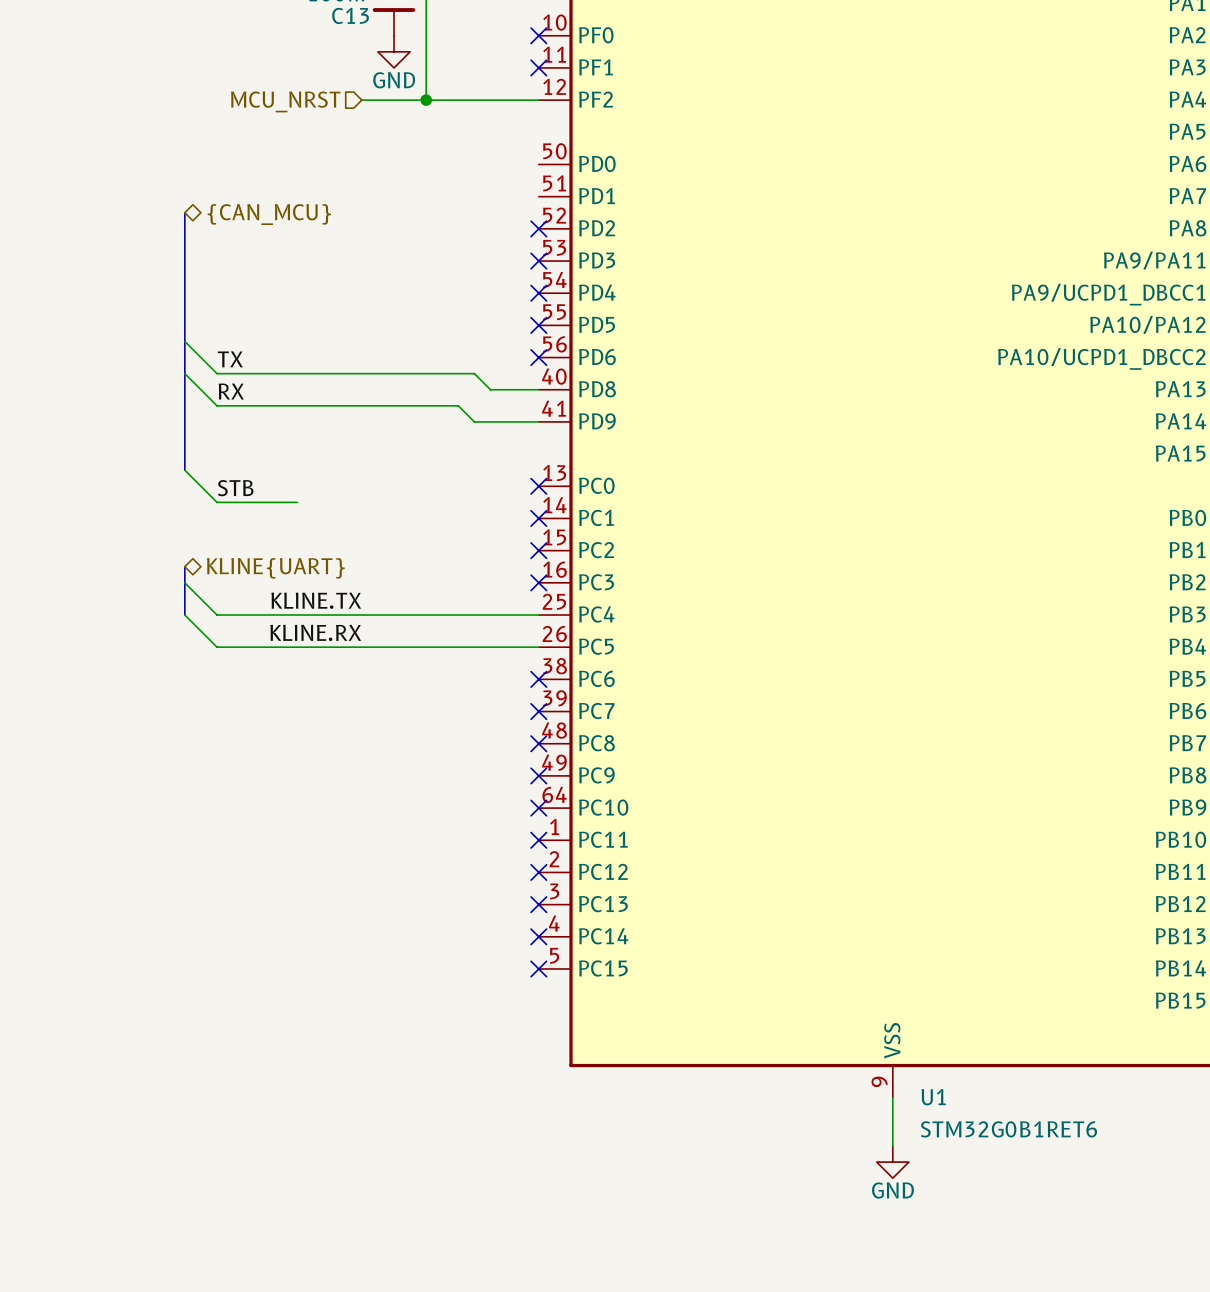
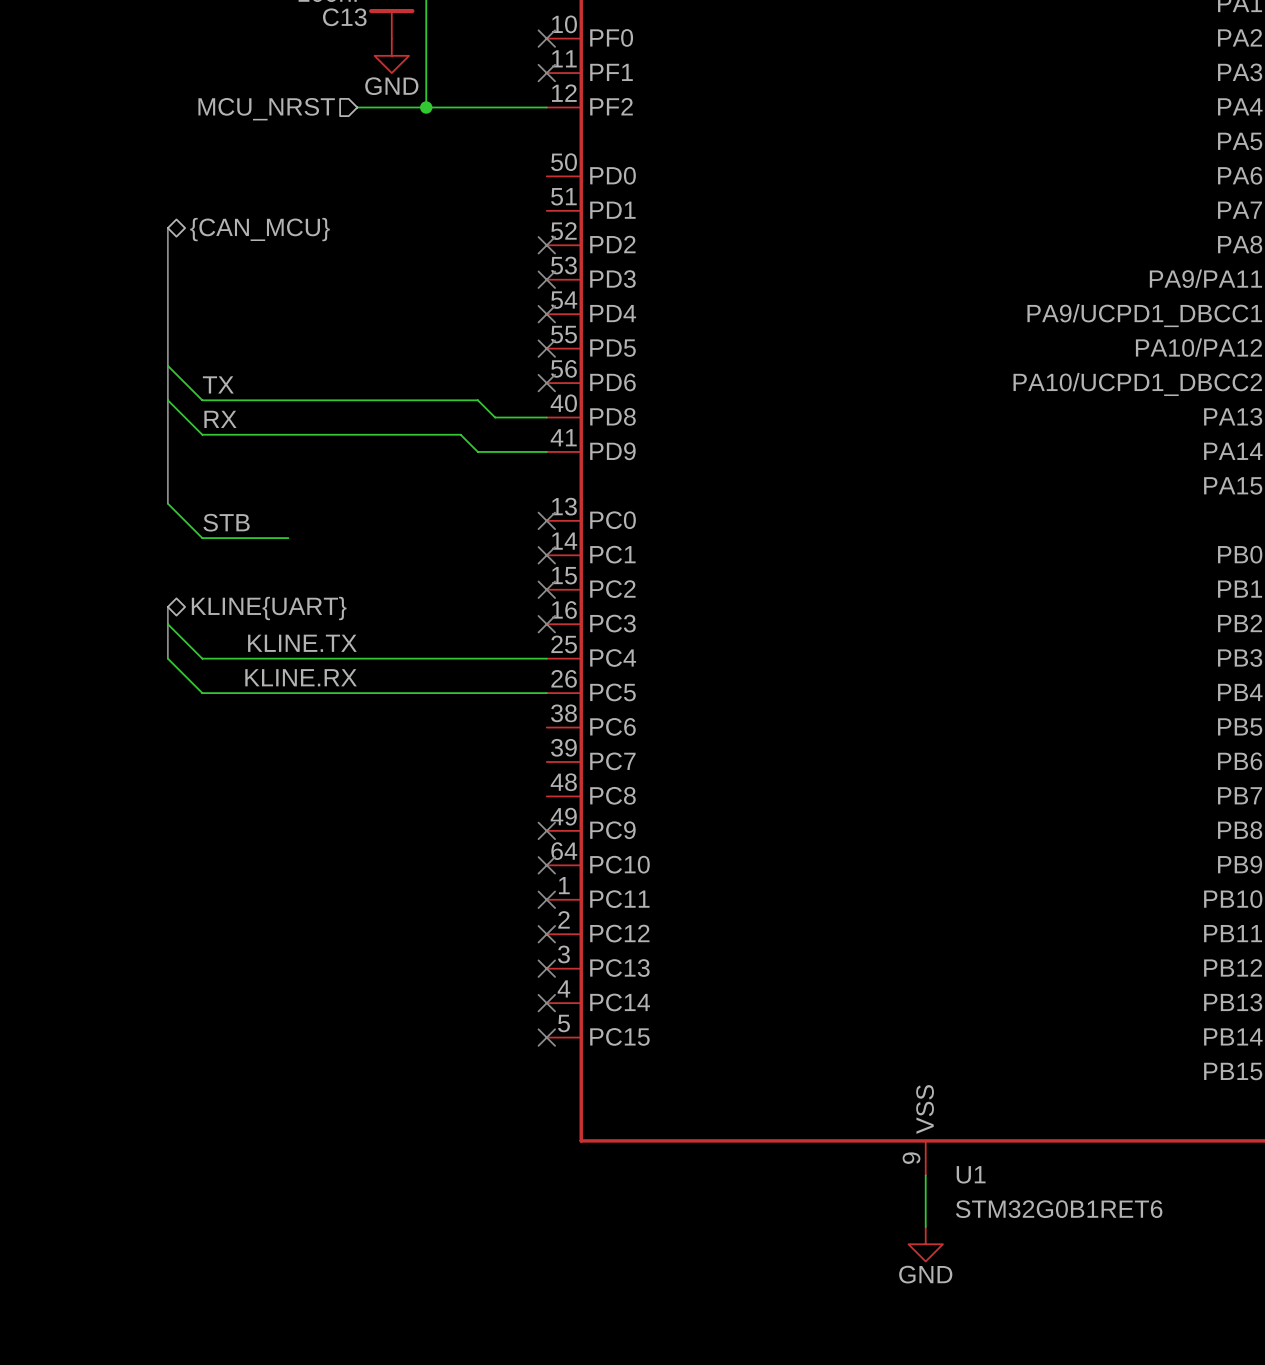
no-connect mark: (538, 679) -> none
no-connect mark: (538, 711) -> none
no-connect mark: (538, 743) -> none

